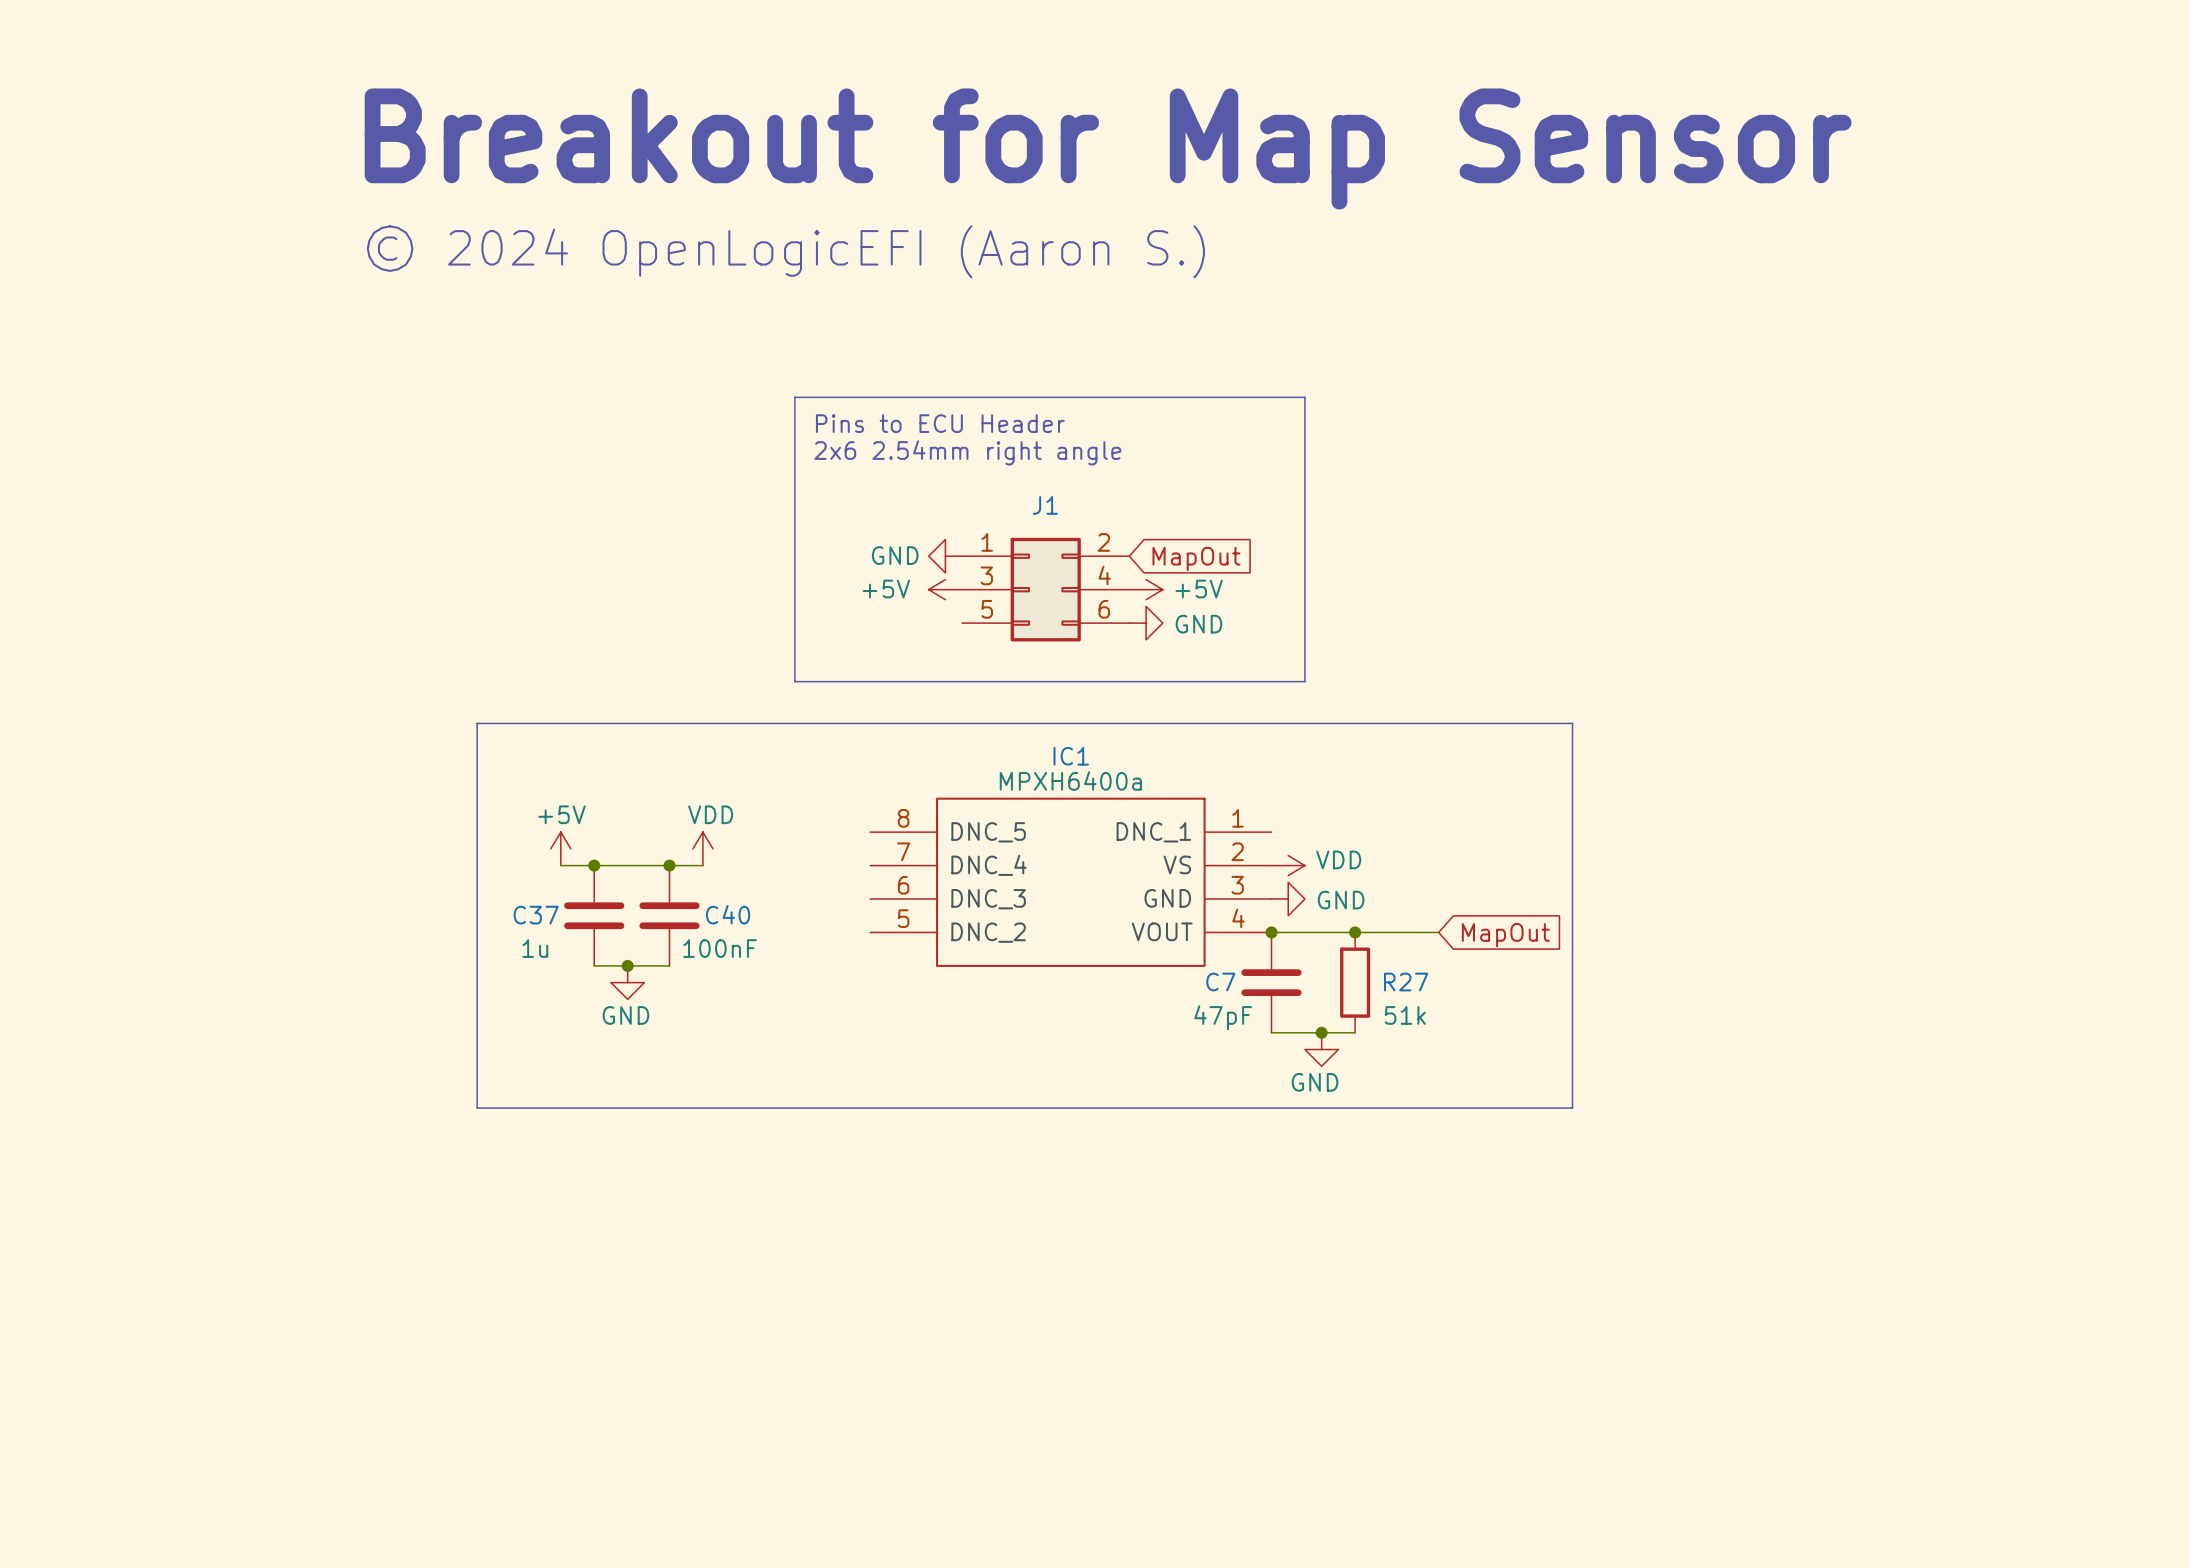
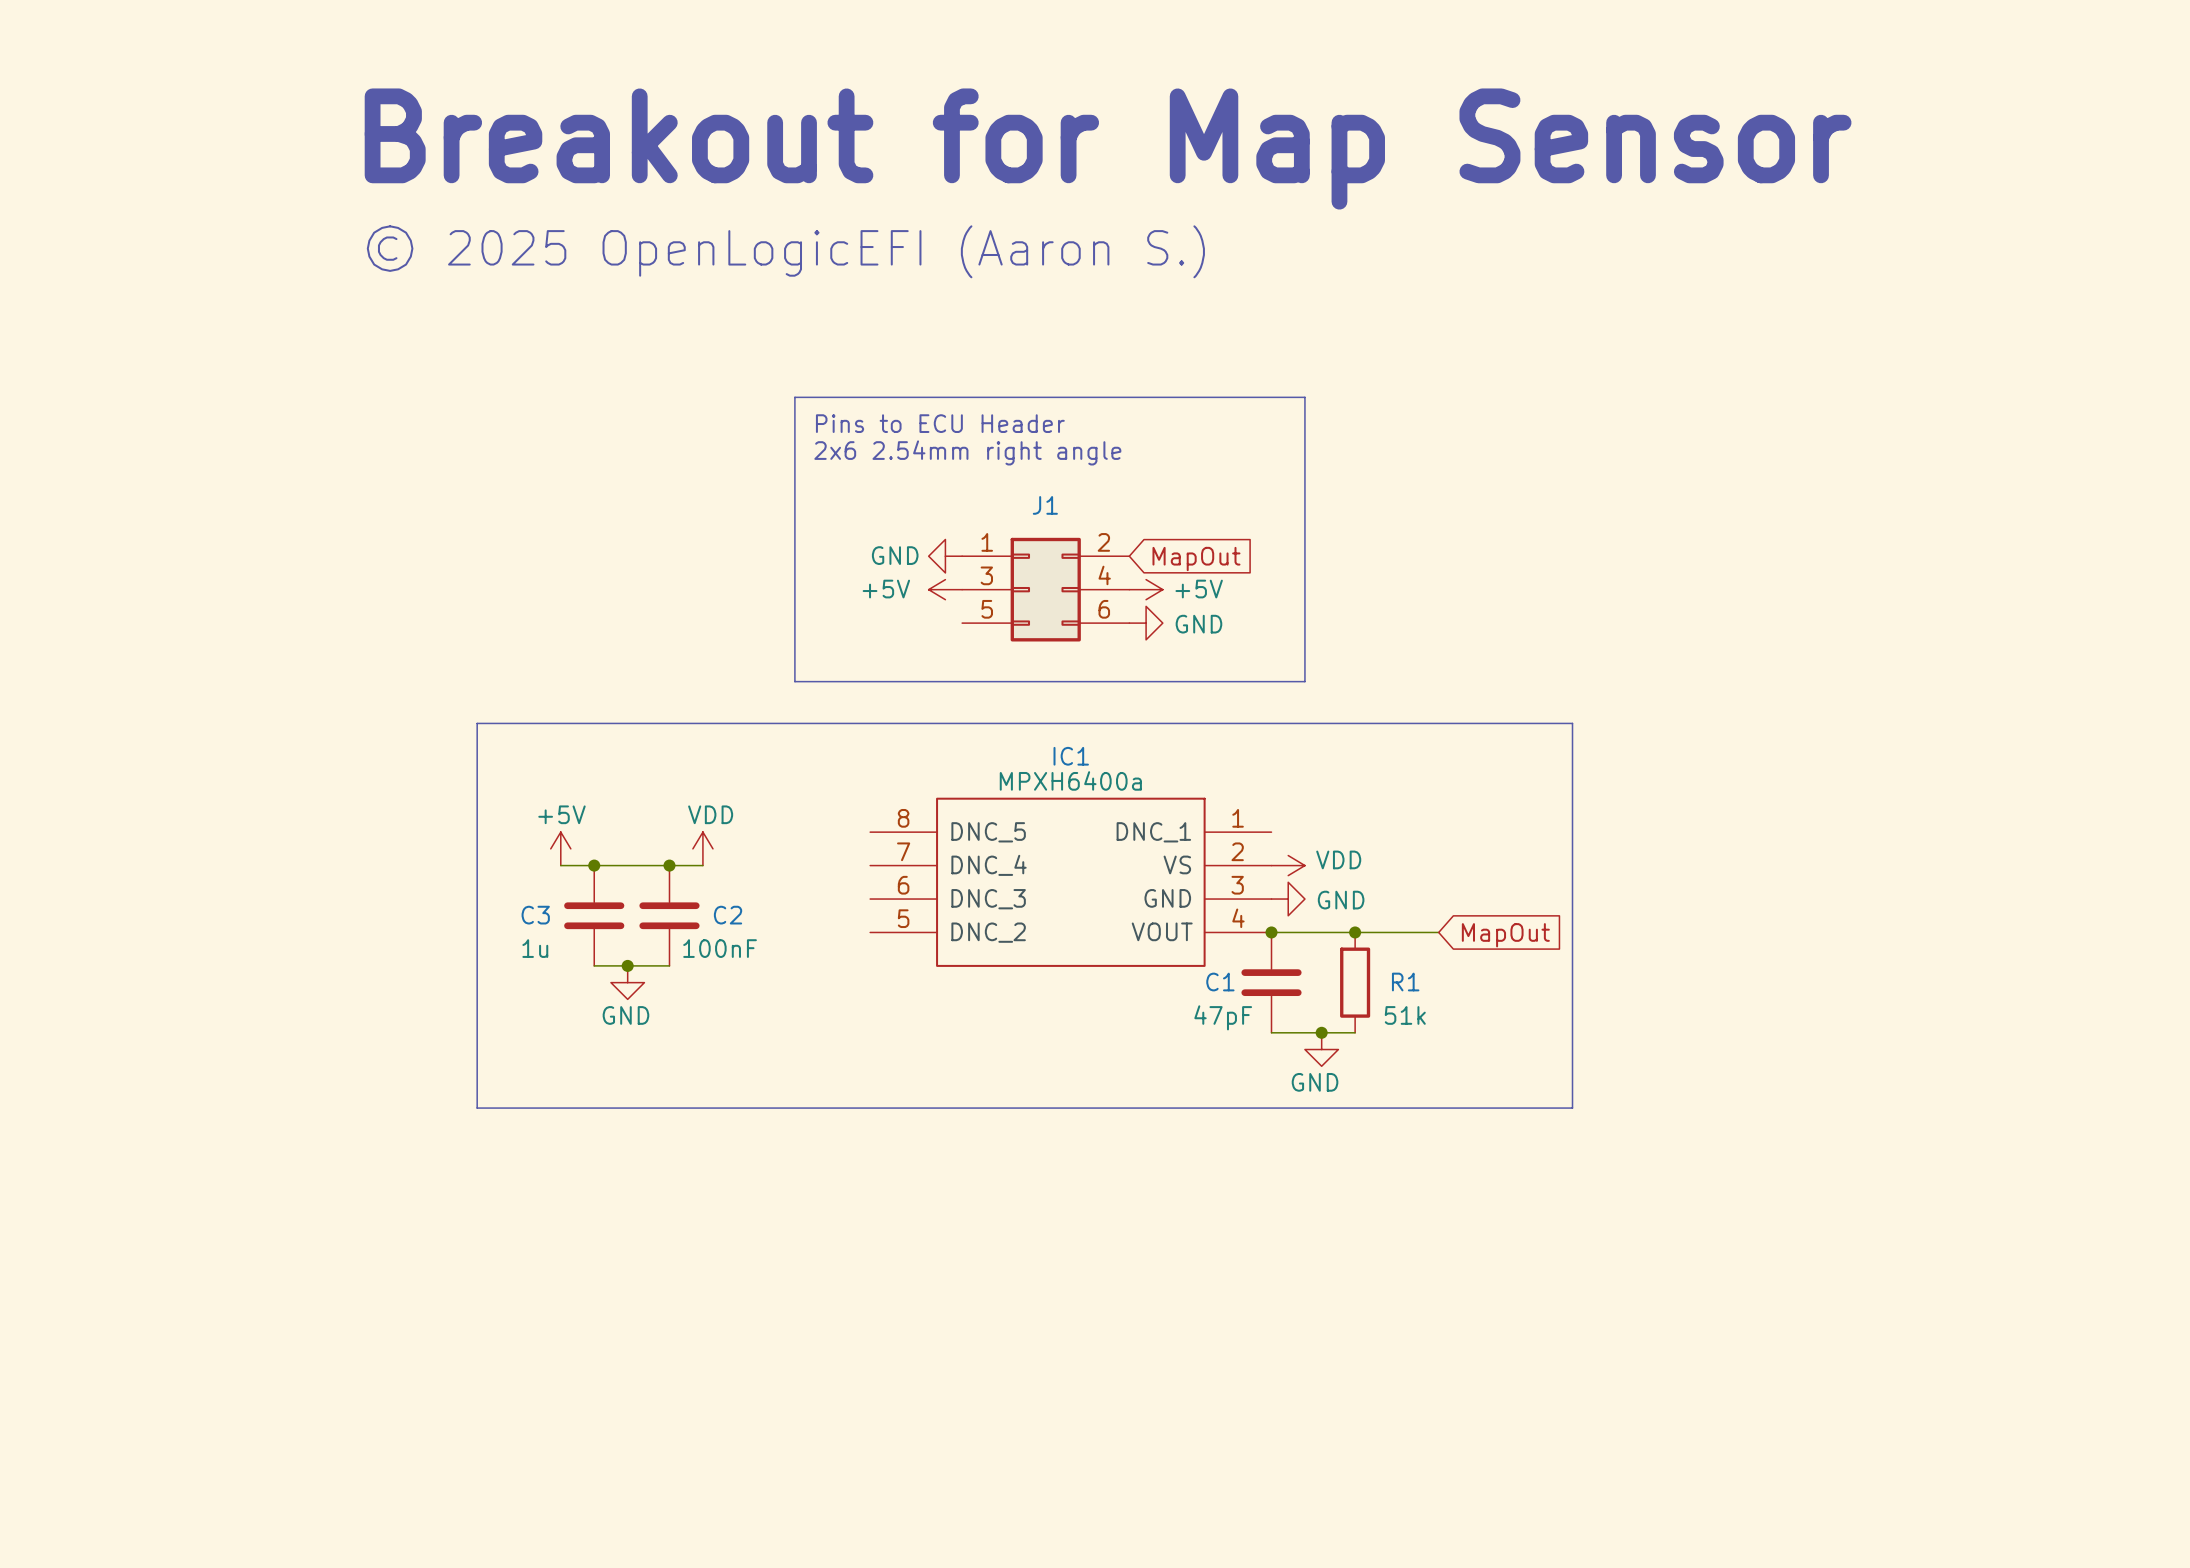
text: © 2024 OpenLogicEFI (Aaron S.) (785, 251) -> © 2025 OpenLogicEFI (Aaron S.) (785, 251)
C40 name: C40 (728, 914) -> C2 (728, 915)
C37 name: C37 (536, 915) -> C3 (535, 915)
C7 name: C7 (1220, 982) -> C1 (1220, 982)
R27 name: R27 (1406, 982) -> R1 (1405, 982)

